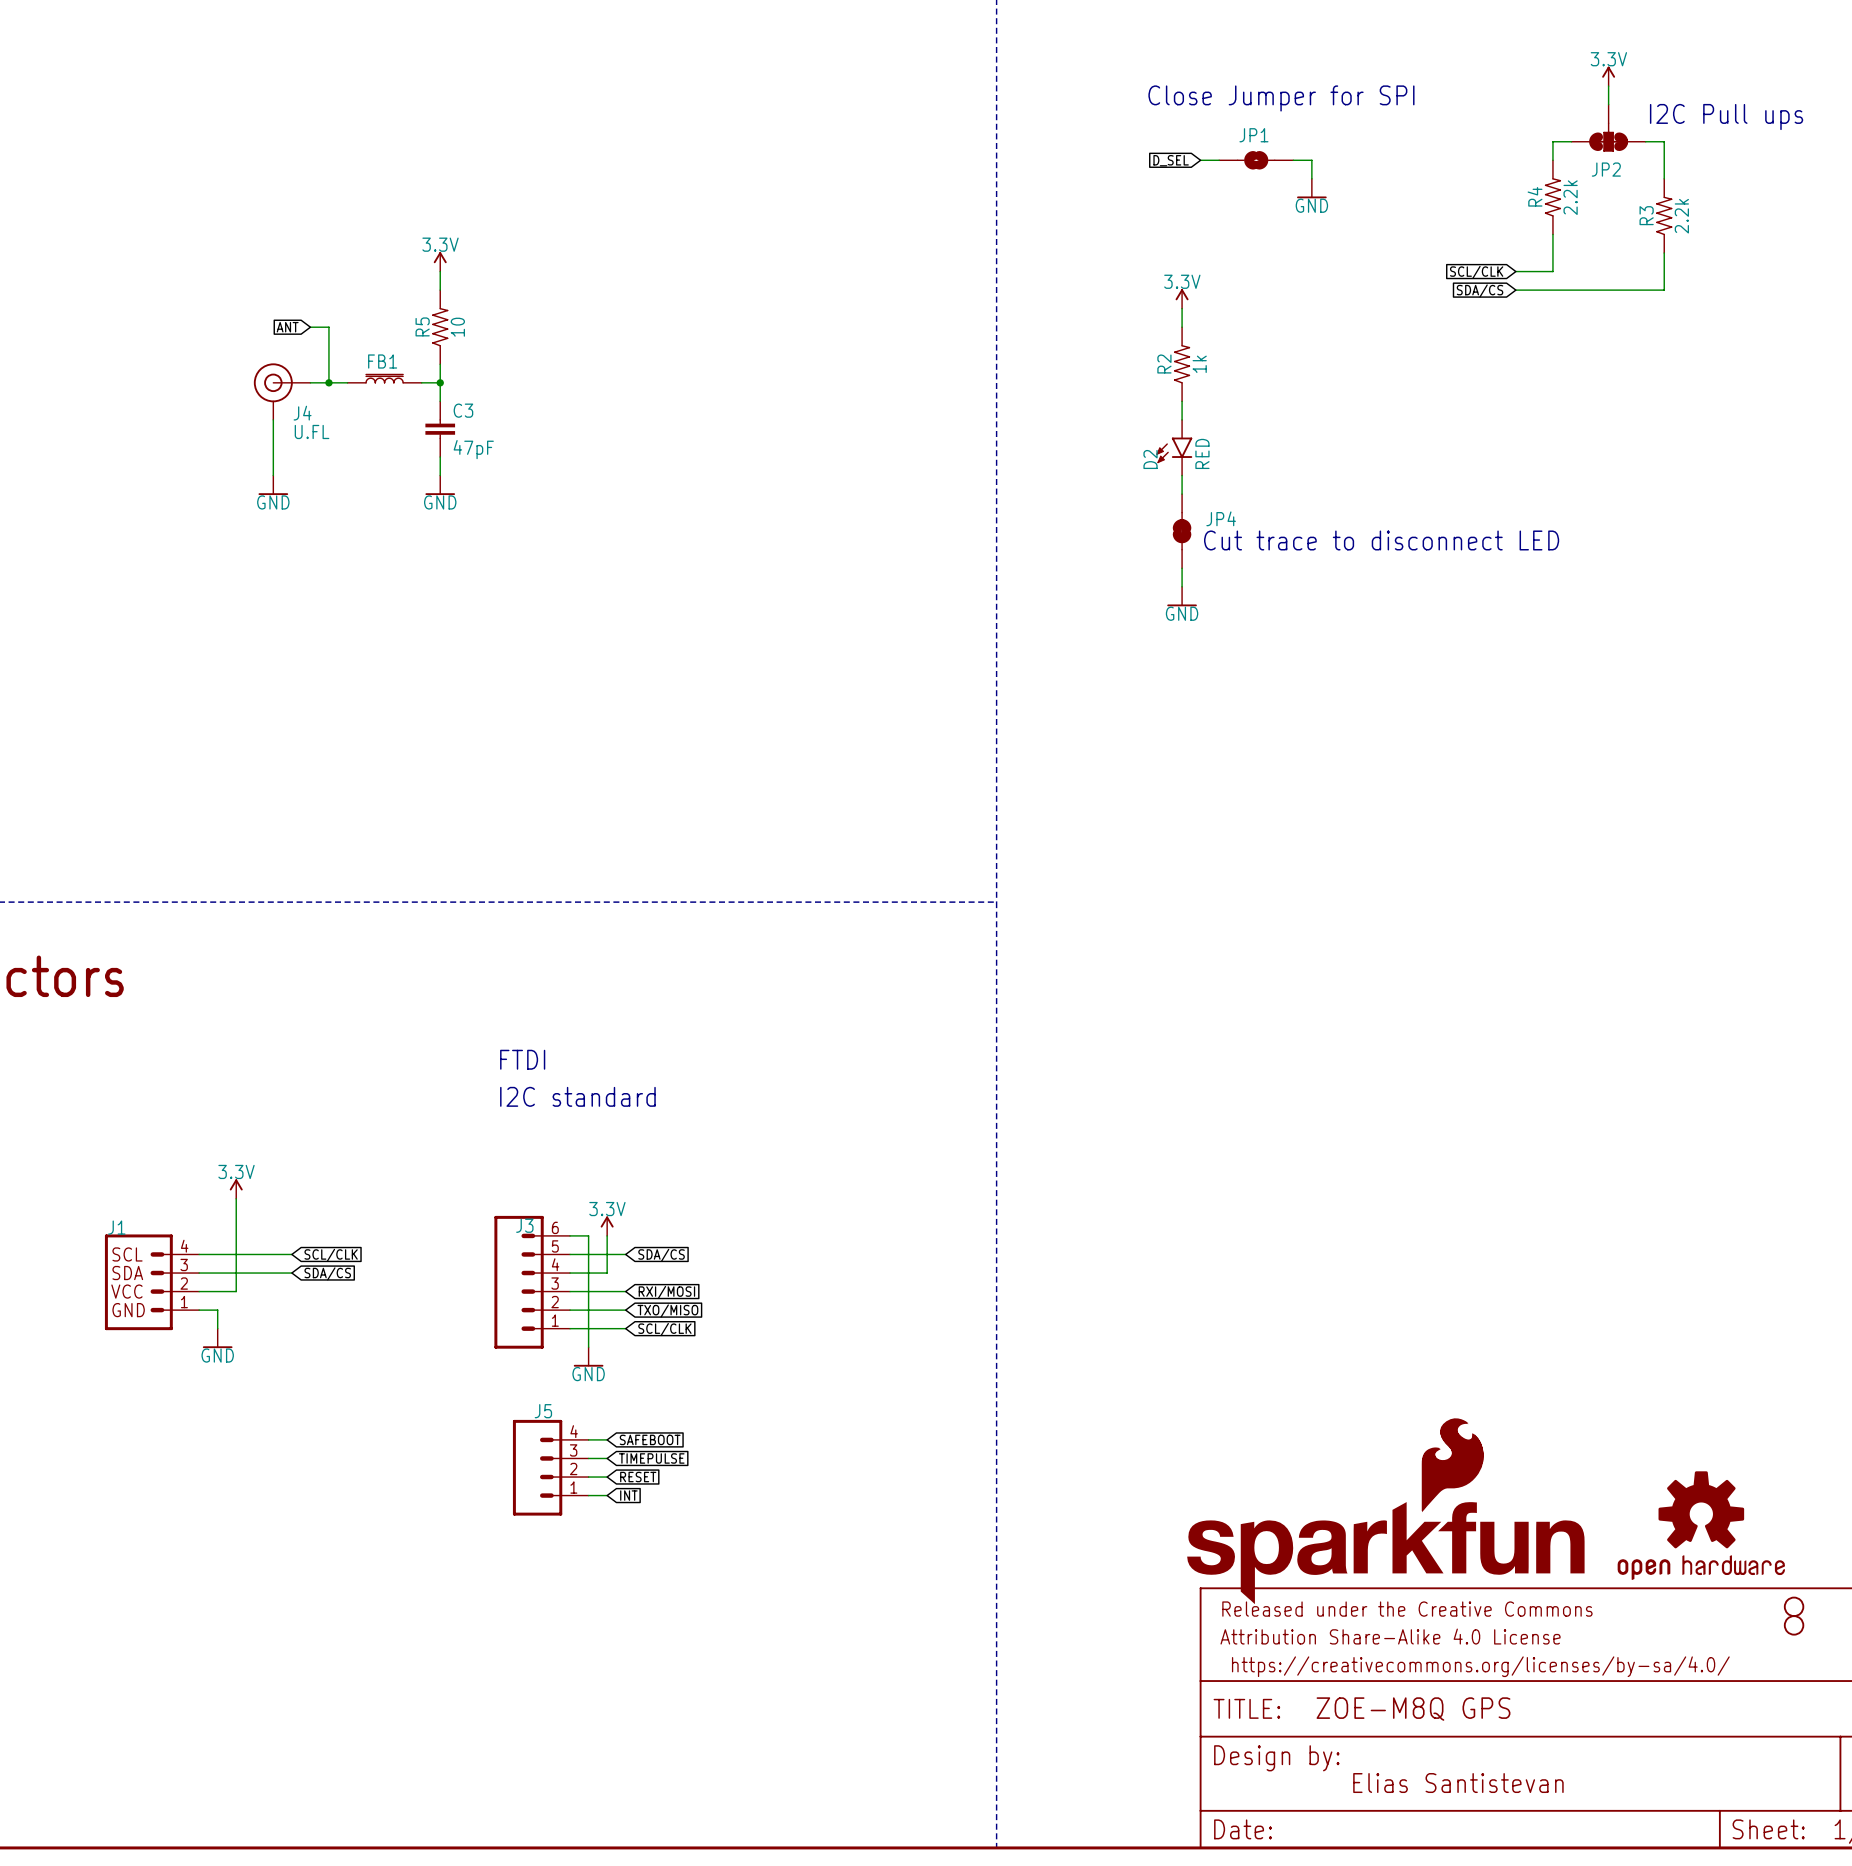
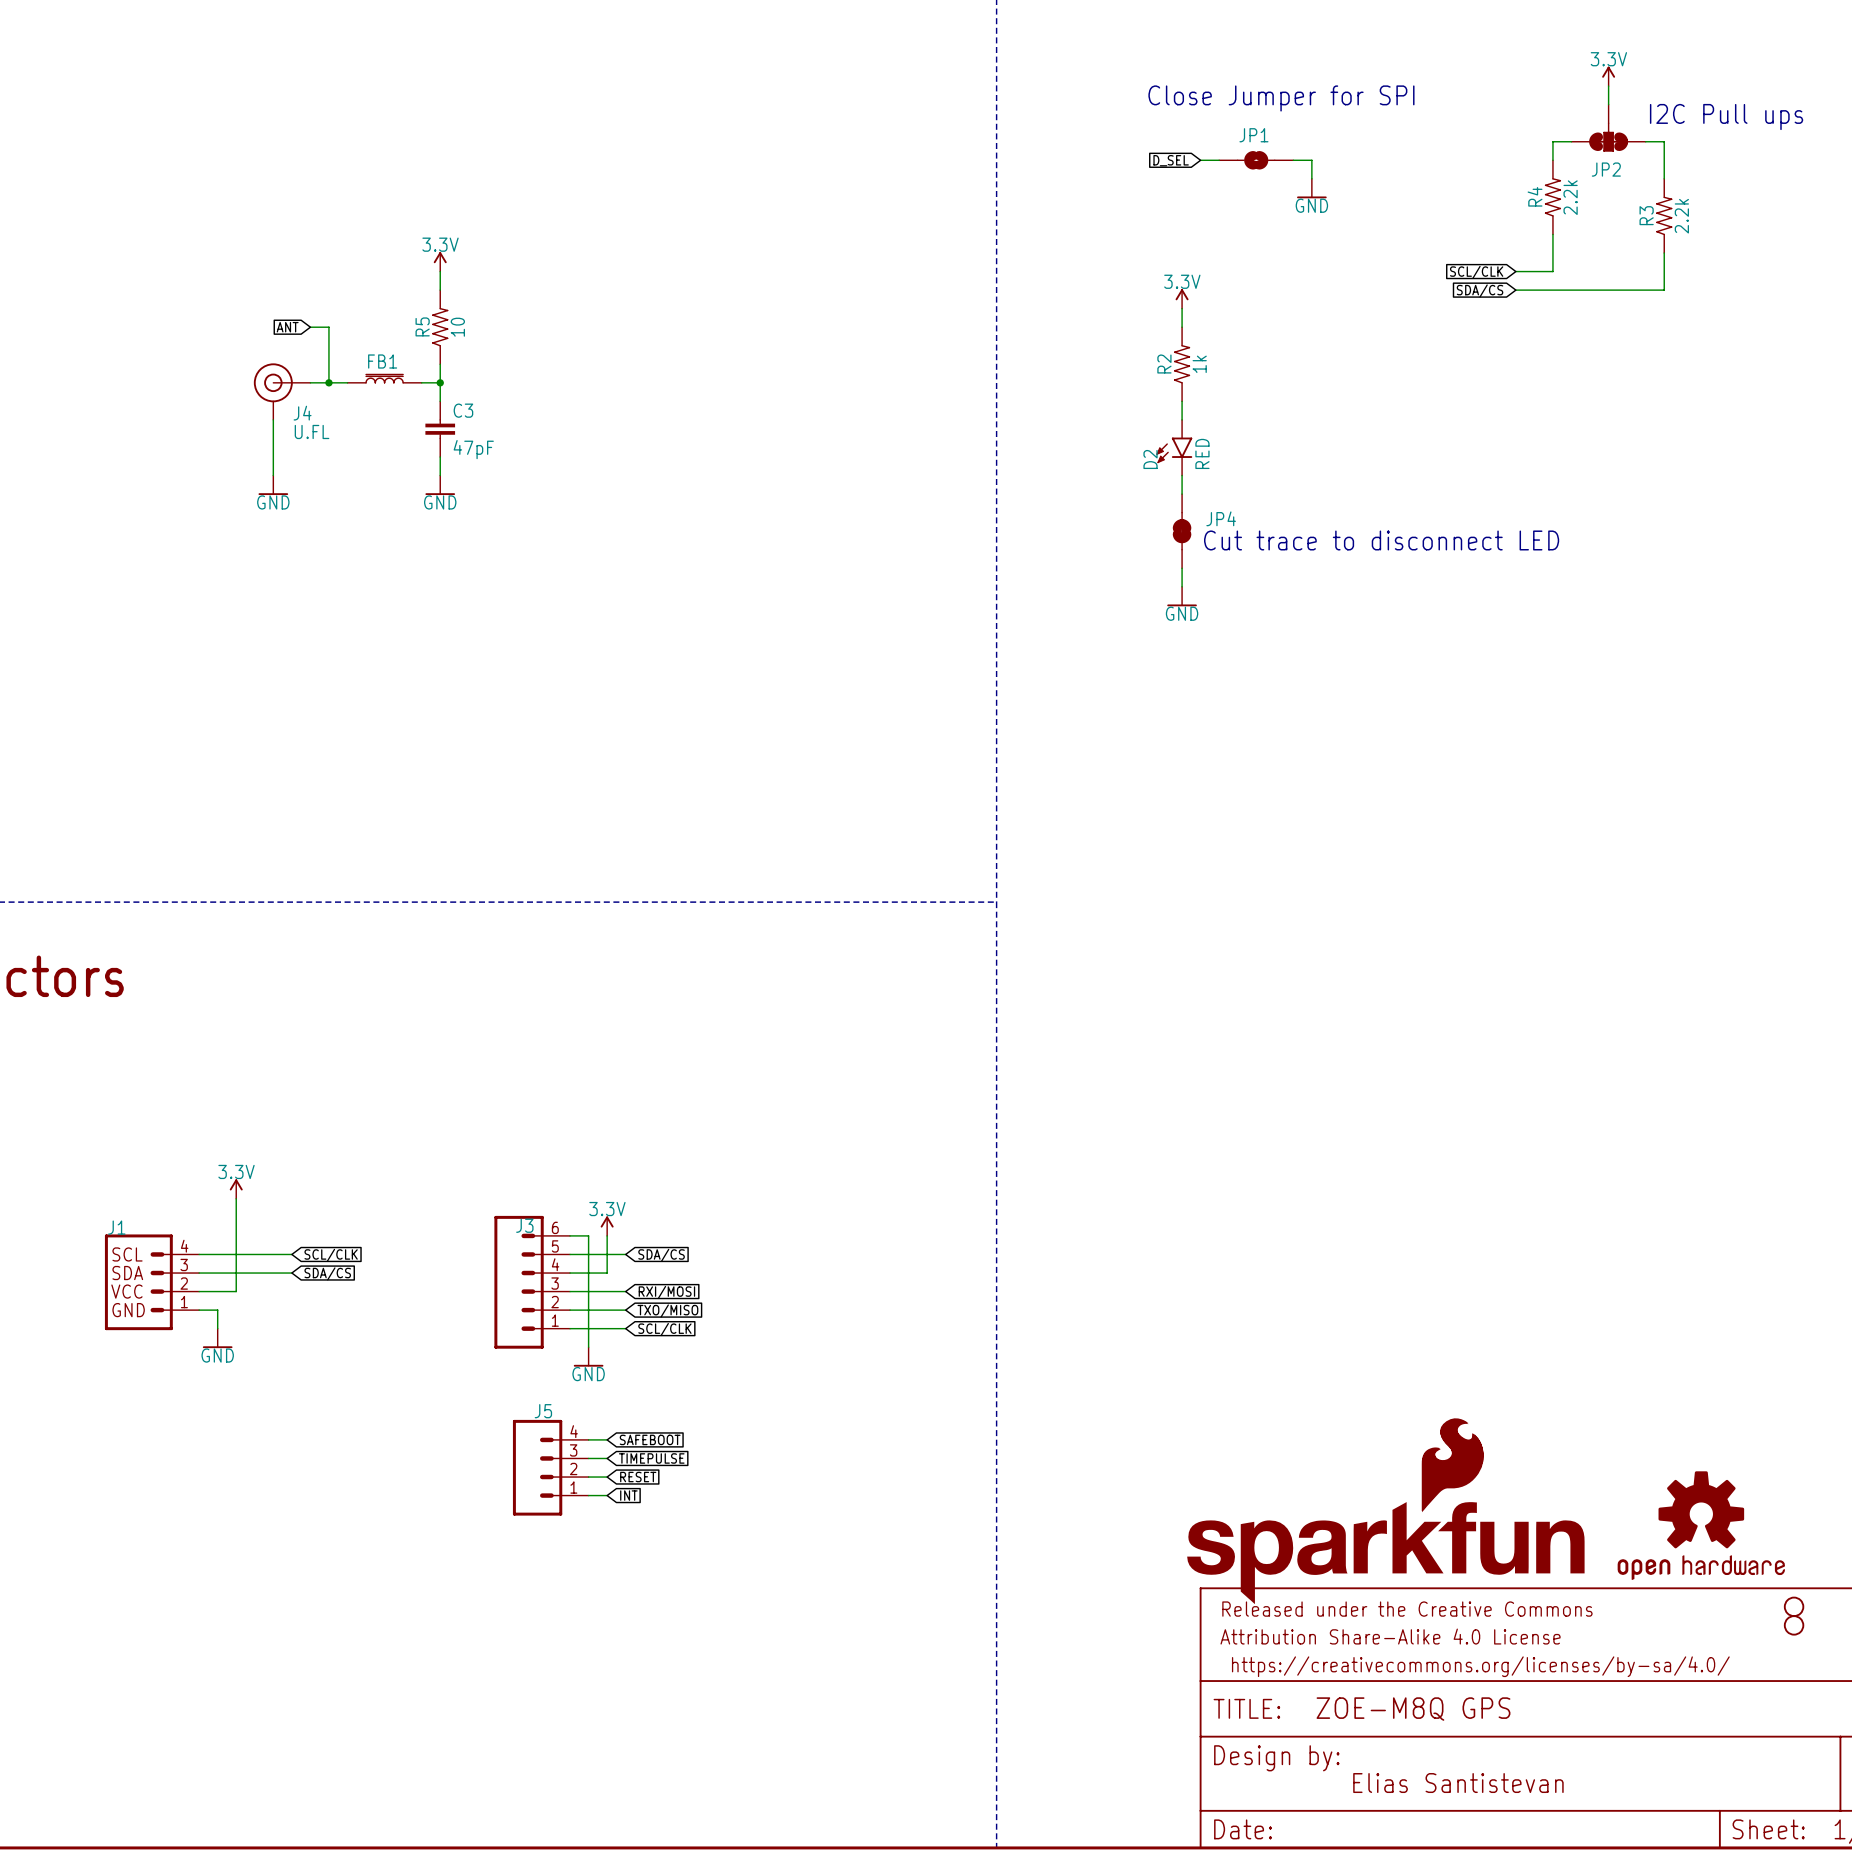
text: FTDI (522, 1059) -> none
text: I2C standard (577, 1096) -> none

